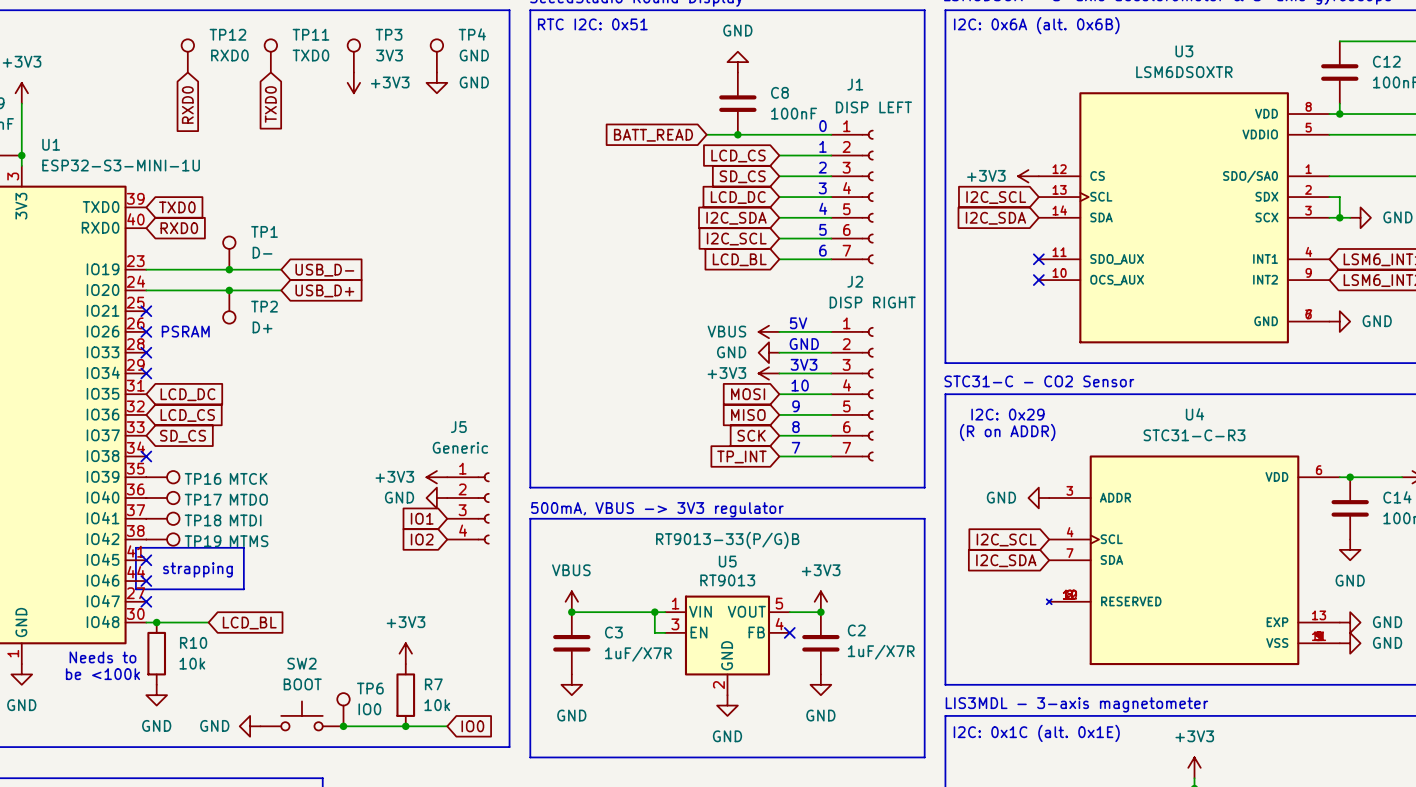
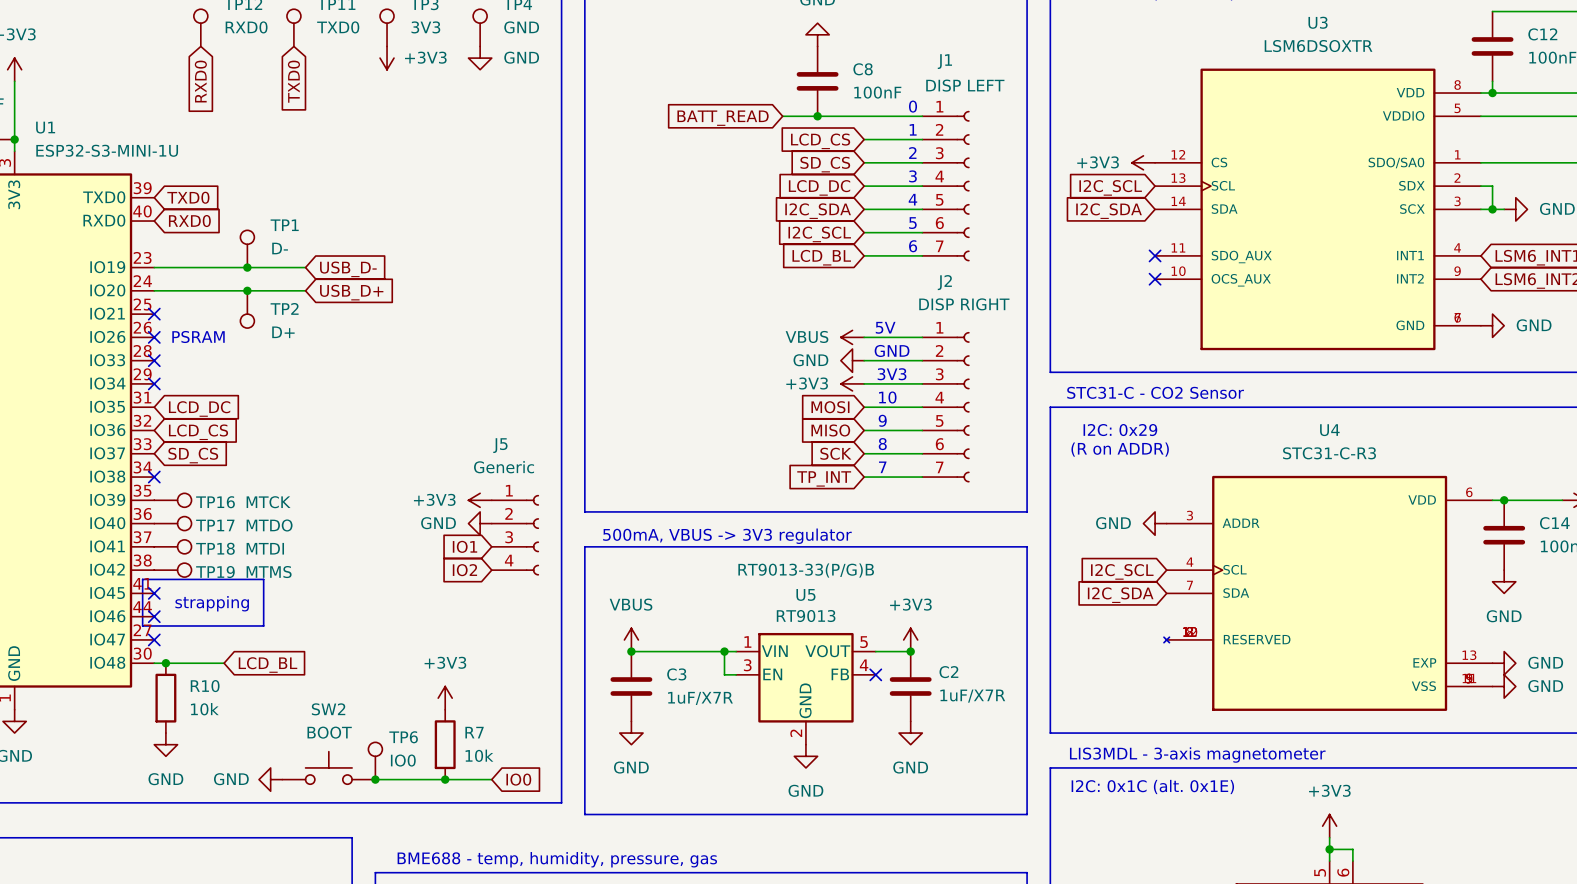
text: Needs to (102, 657) -> none
text: be <100k (102, 674) -> none

